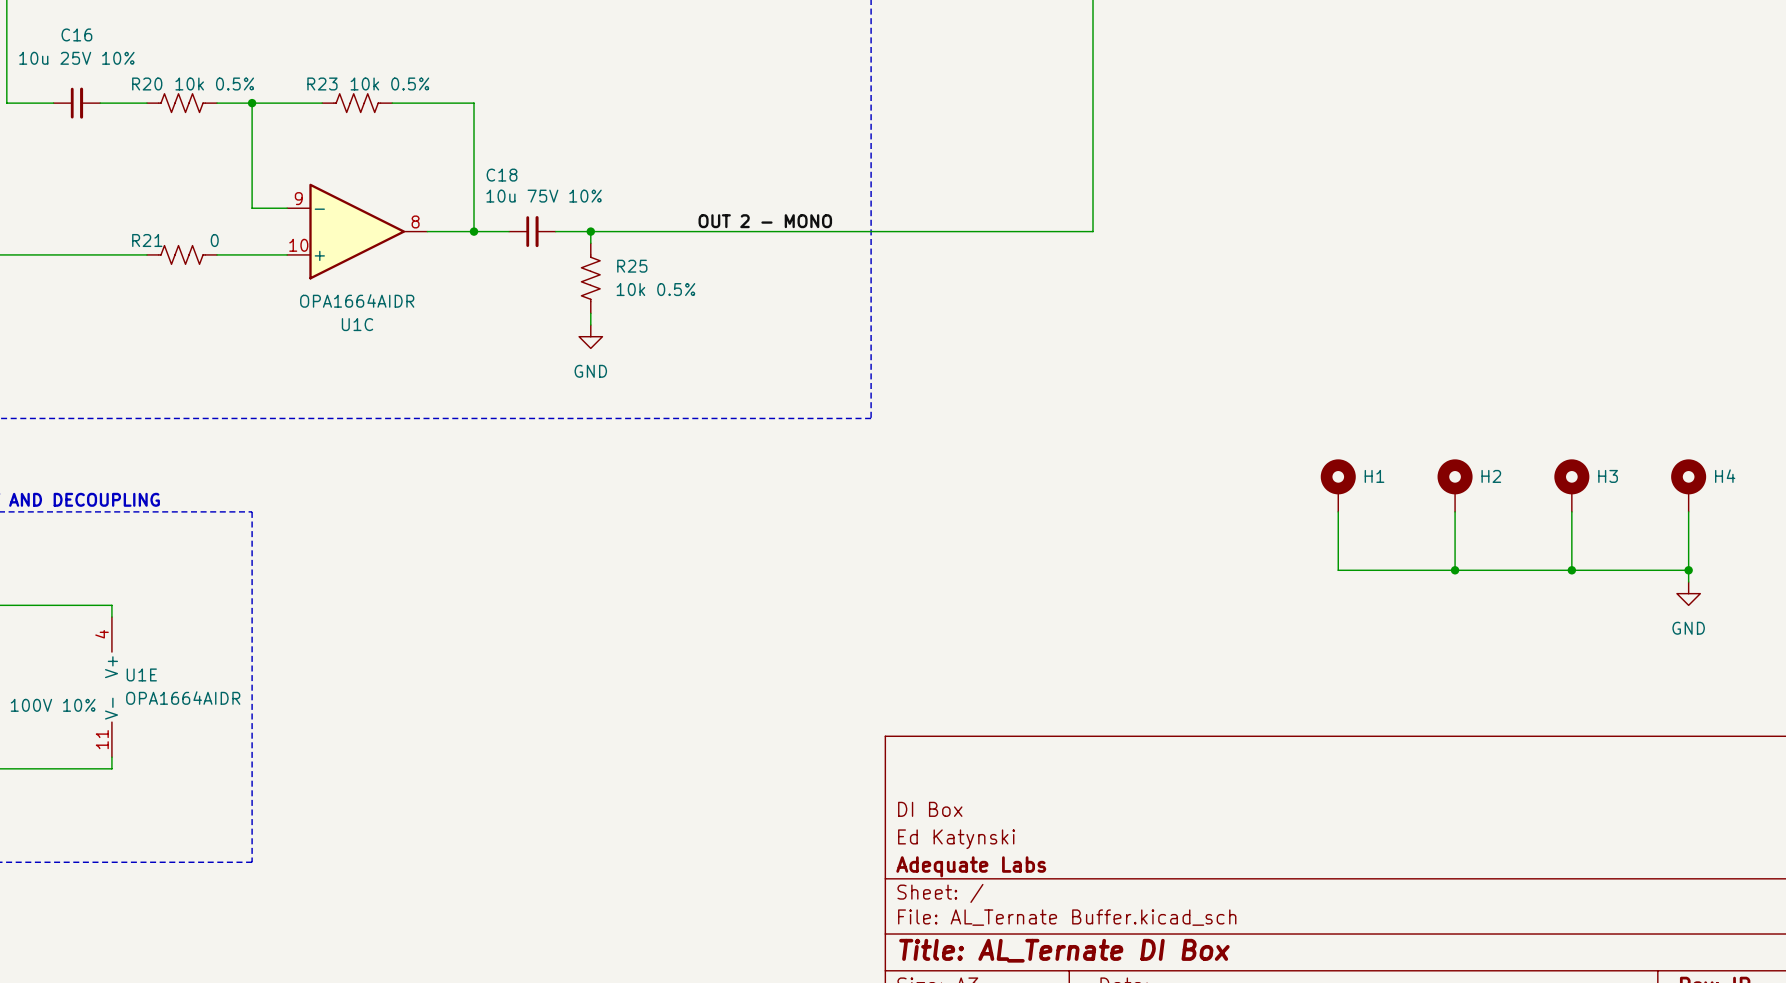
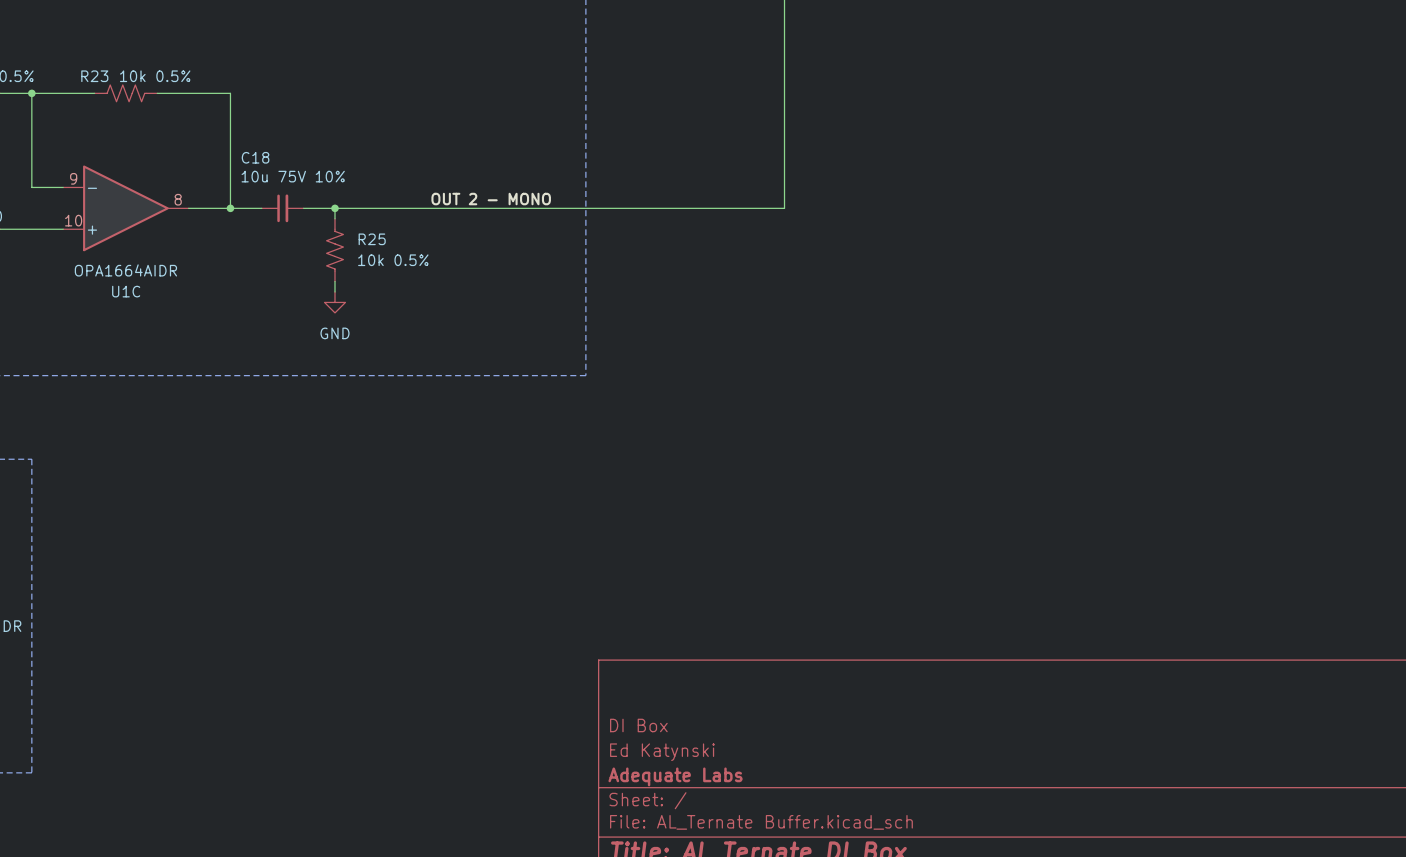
H1: (1338, 485) -> none
H2: (1455, 485) -> none
H3: (1571, 485) -> none
H4: (1688, 485) -> none
wire: (1338, 511) (1338, 570) (1688, 570) -> none
wire: (1455, 511) (1455, 570) -> none
wire: (1571, 511) (1571, 570) -> none
wire: (1688, 511) (1688, 581) -> none
junction: (1455, 570) -> none
junction: (1571, 570) -> none
junction: (1688, 570) -> none
power symbol: GND (1688, 593) -> none

